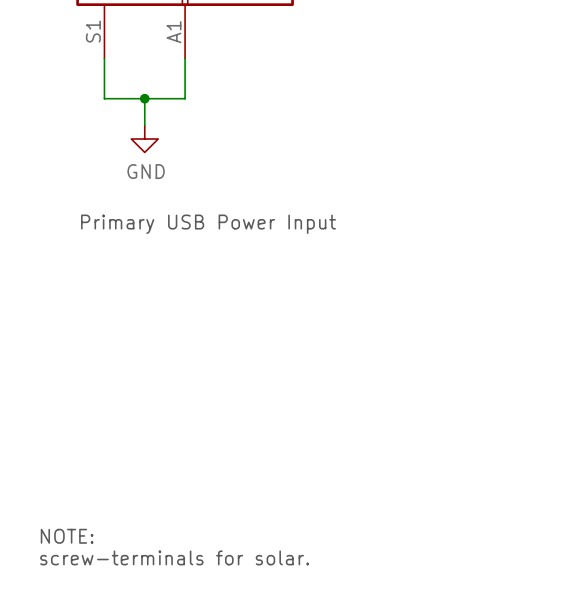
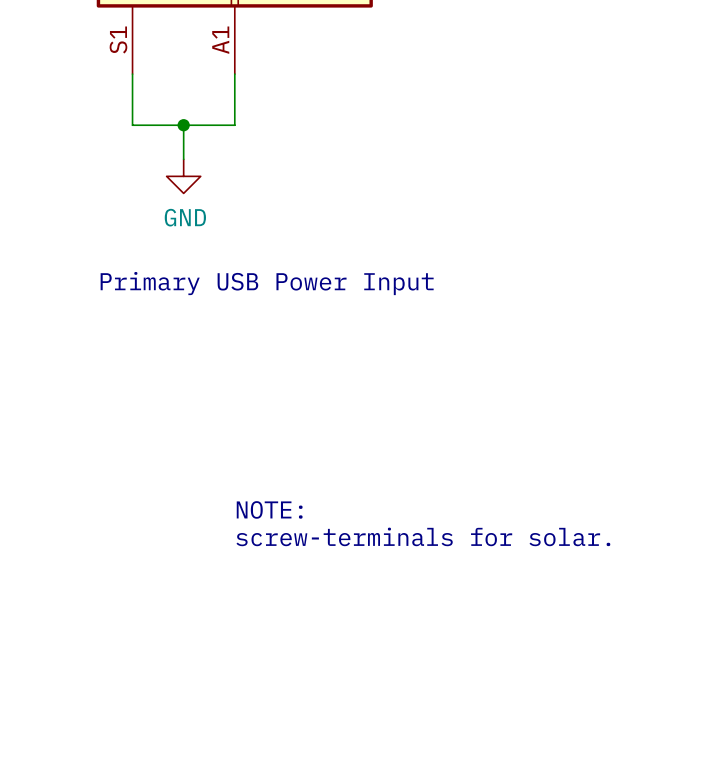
text position: NOTE: (67, 536) -> NOTE: (269, 509)
text position: screw-terminals for solar. (174, 557) -> screw-terminals for solar. (423, 536)

